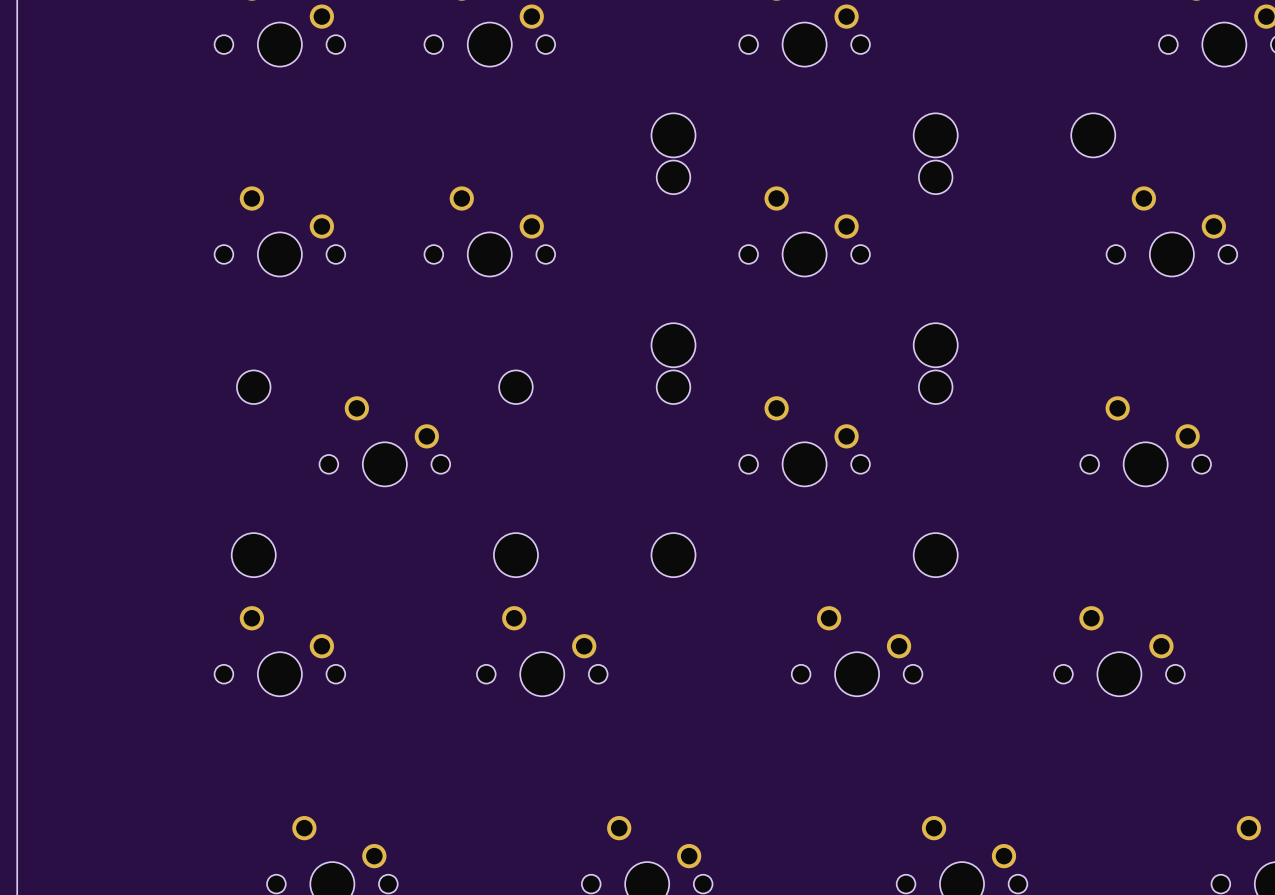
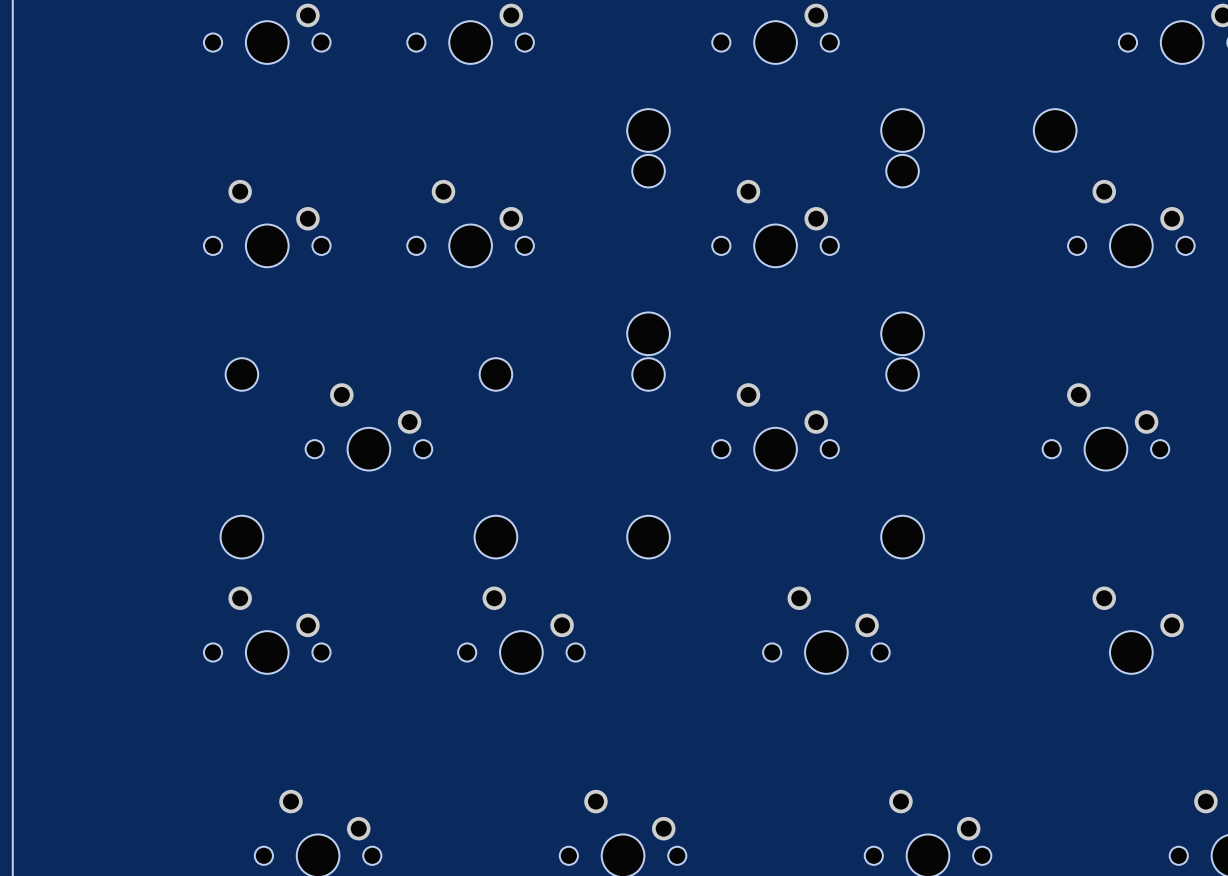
part: (1119, 651) -> none
part: none -> (1138, 630)

